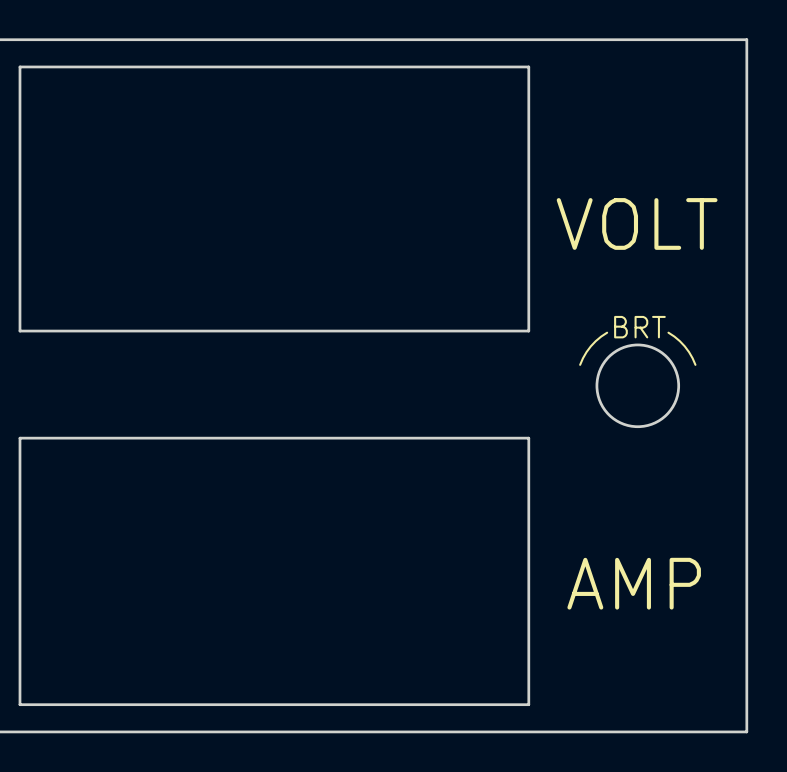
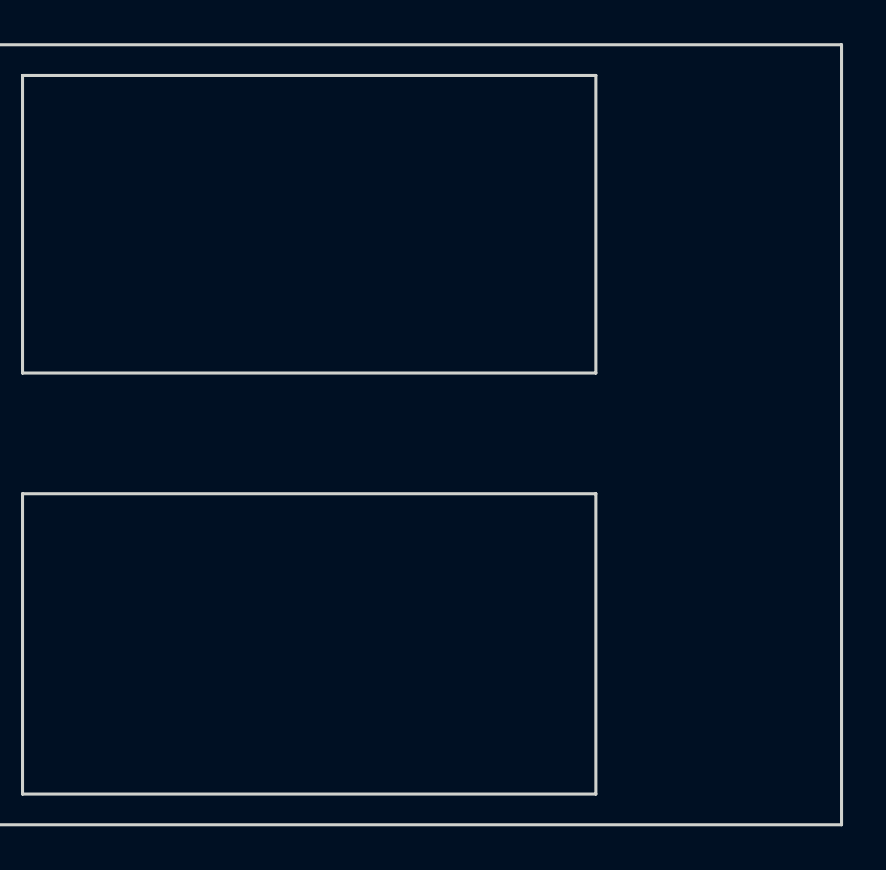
text: VOLT (637, 223) -> none
text: BRT (639, 327) -> none
line: (607, 332) (590, 346) (580, 364) -> none
line: (668, 332) (684, 346) (695, 364) -> none
round board edge: [595, 343, 681, 429] -> none
text: AMP (634, 583) -> none

